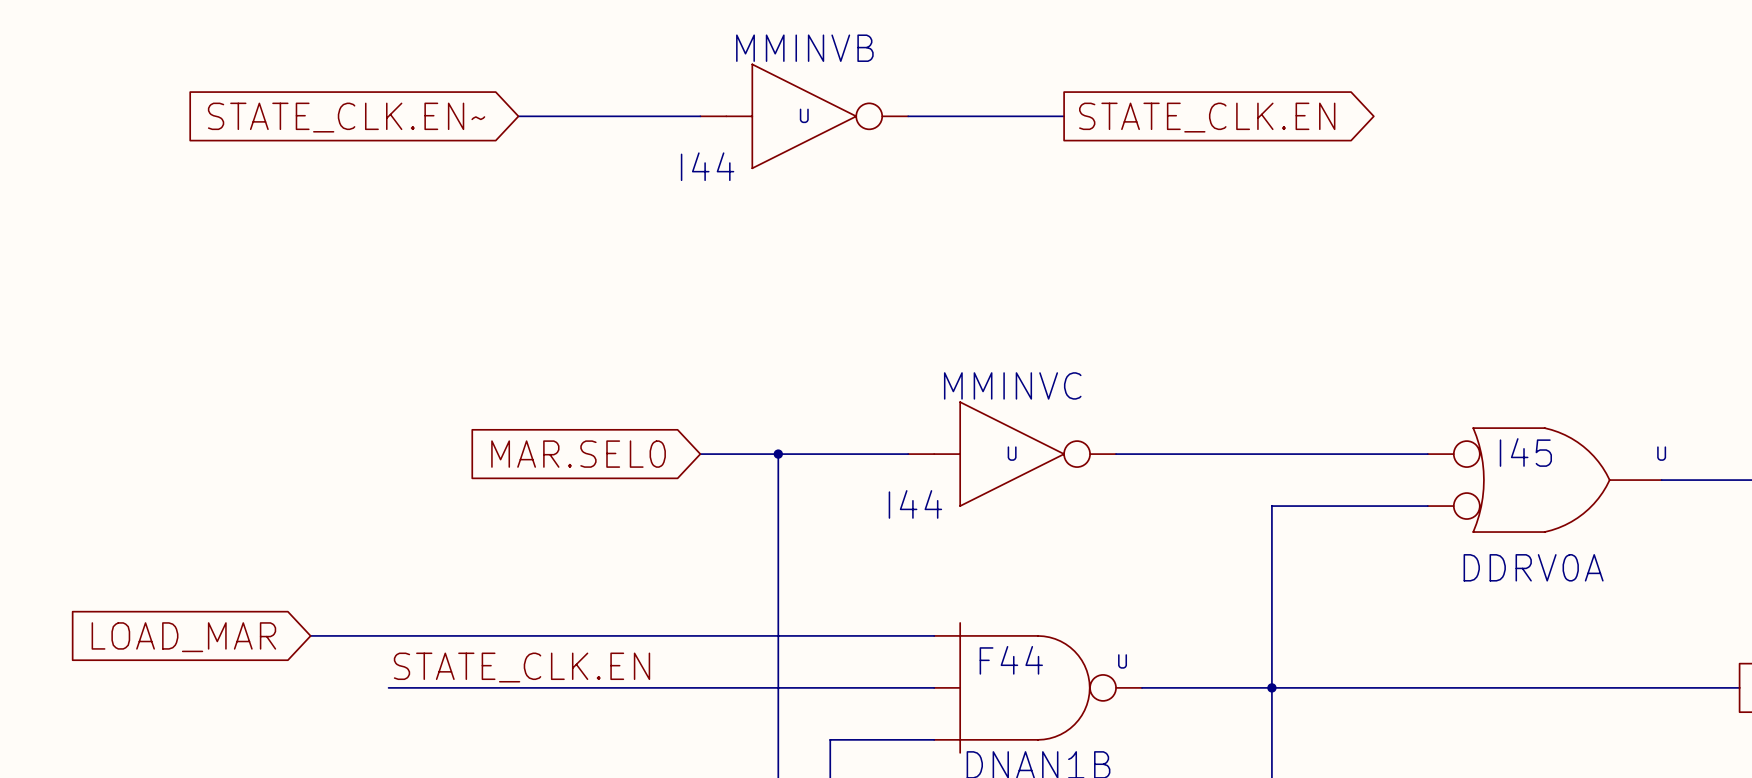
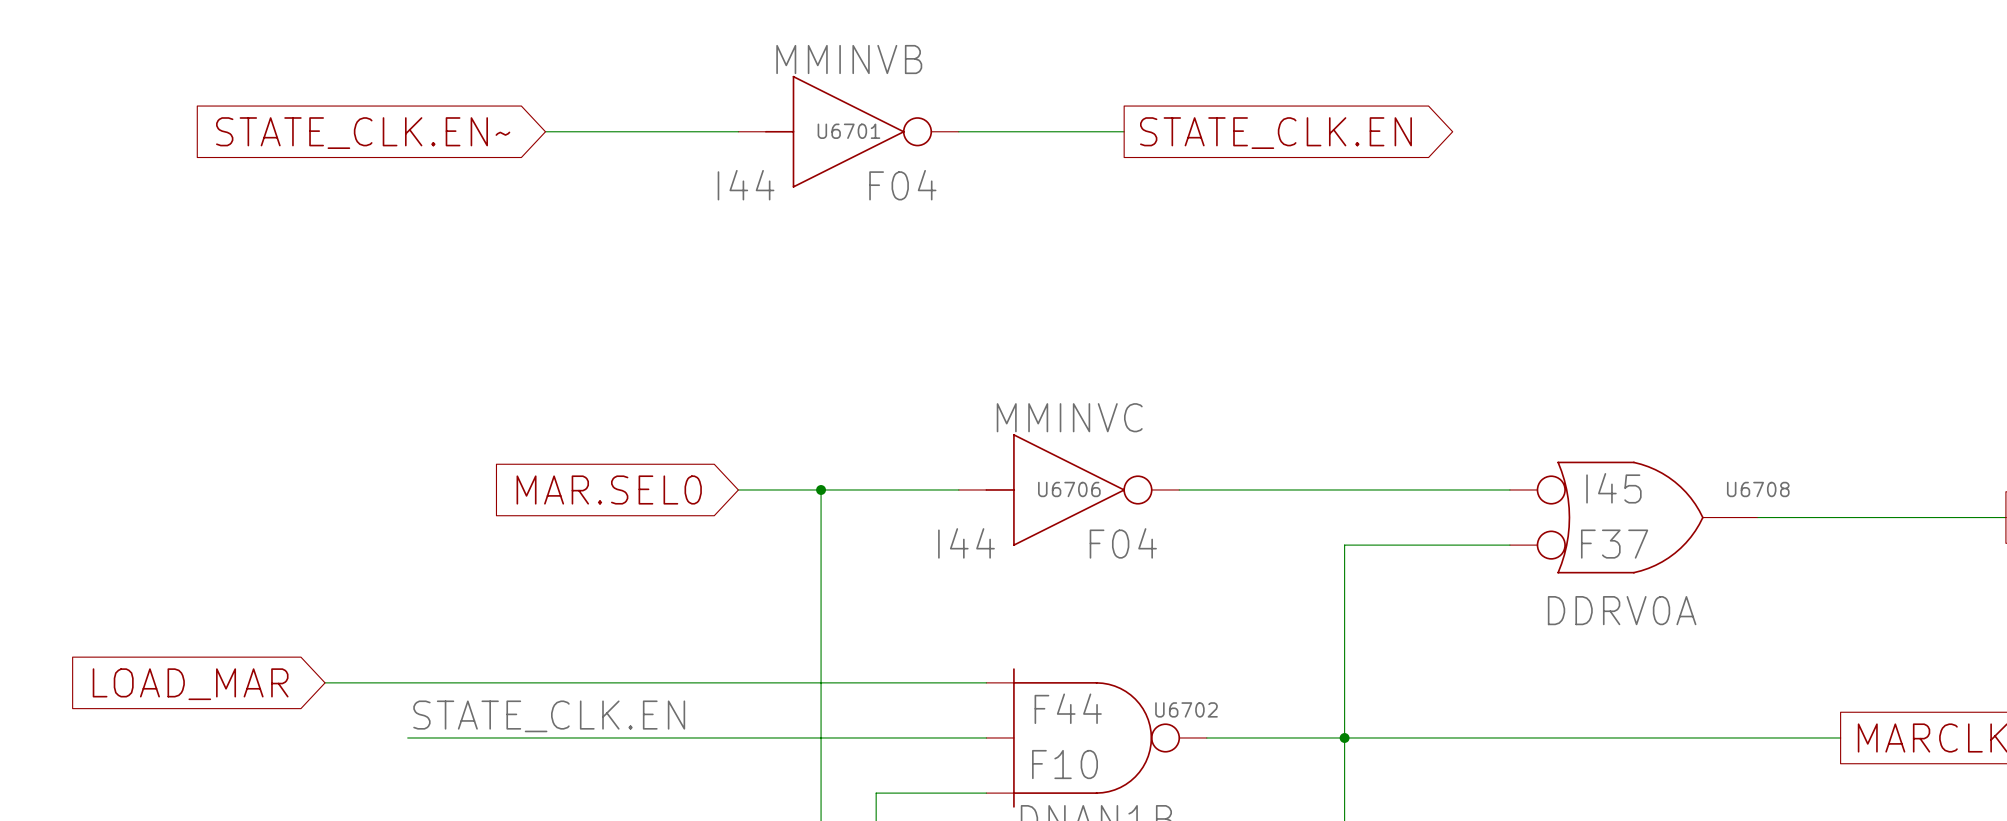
U name: U (804, 115) -> U6701 (848, 131)
U value: none -> F04 (902, 185)
U name: U (1012, 453) -> U6706 (1069, 489)
U name: U (1661, 453) -> U6708 (1758, 489)
U value: none -> F04 (1123, 543)
U value: none -> F37 (1614, 544)
U name: U (1122, 661) -> U6702 (1186, 709)
U value: none -> F10 (1065, 764)

